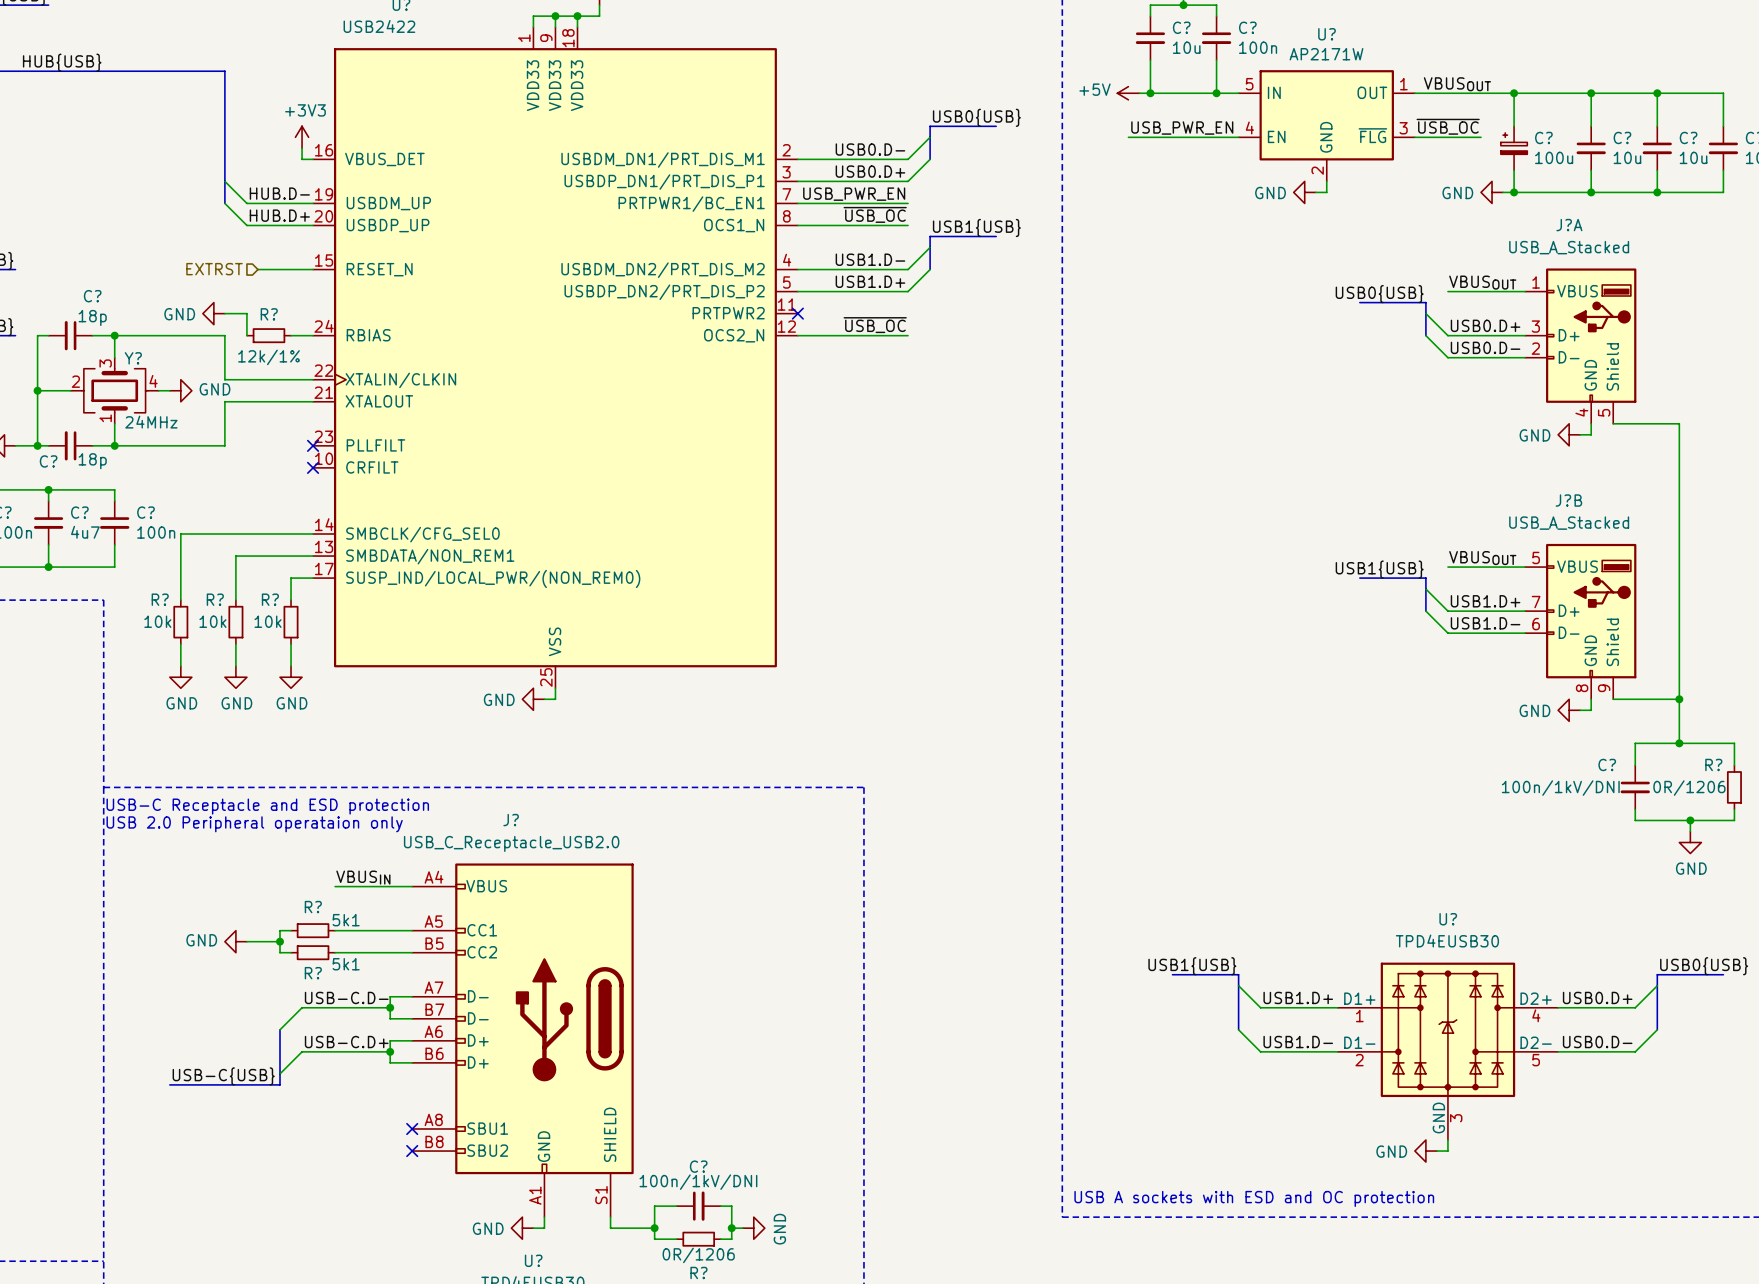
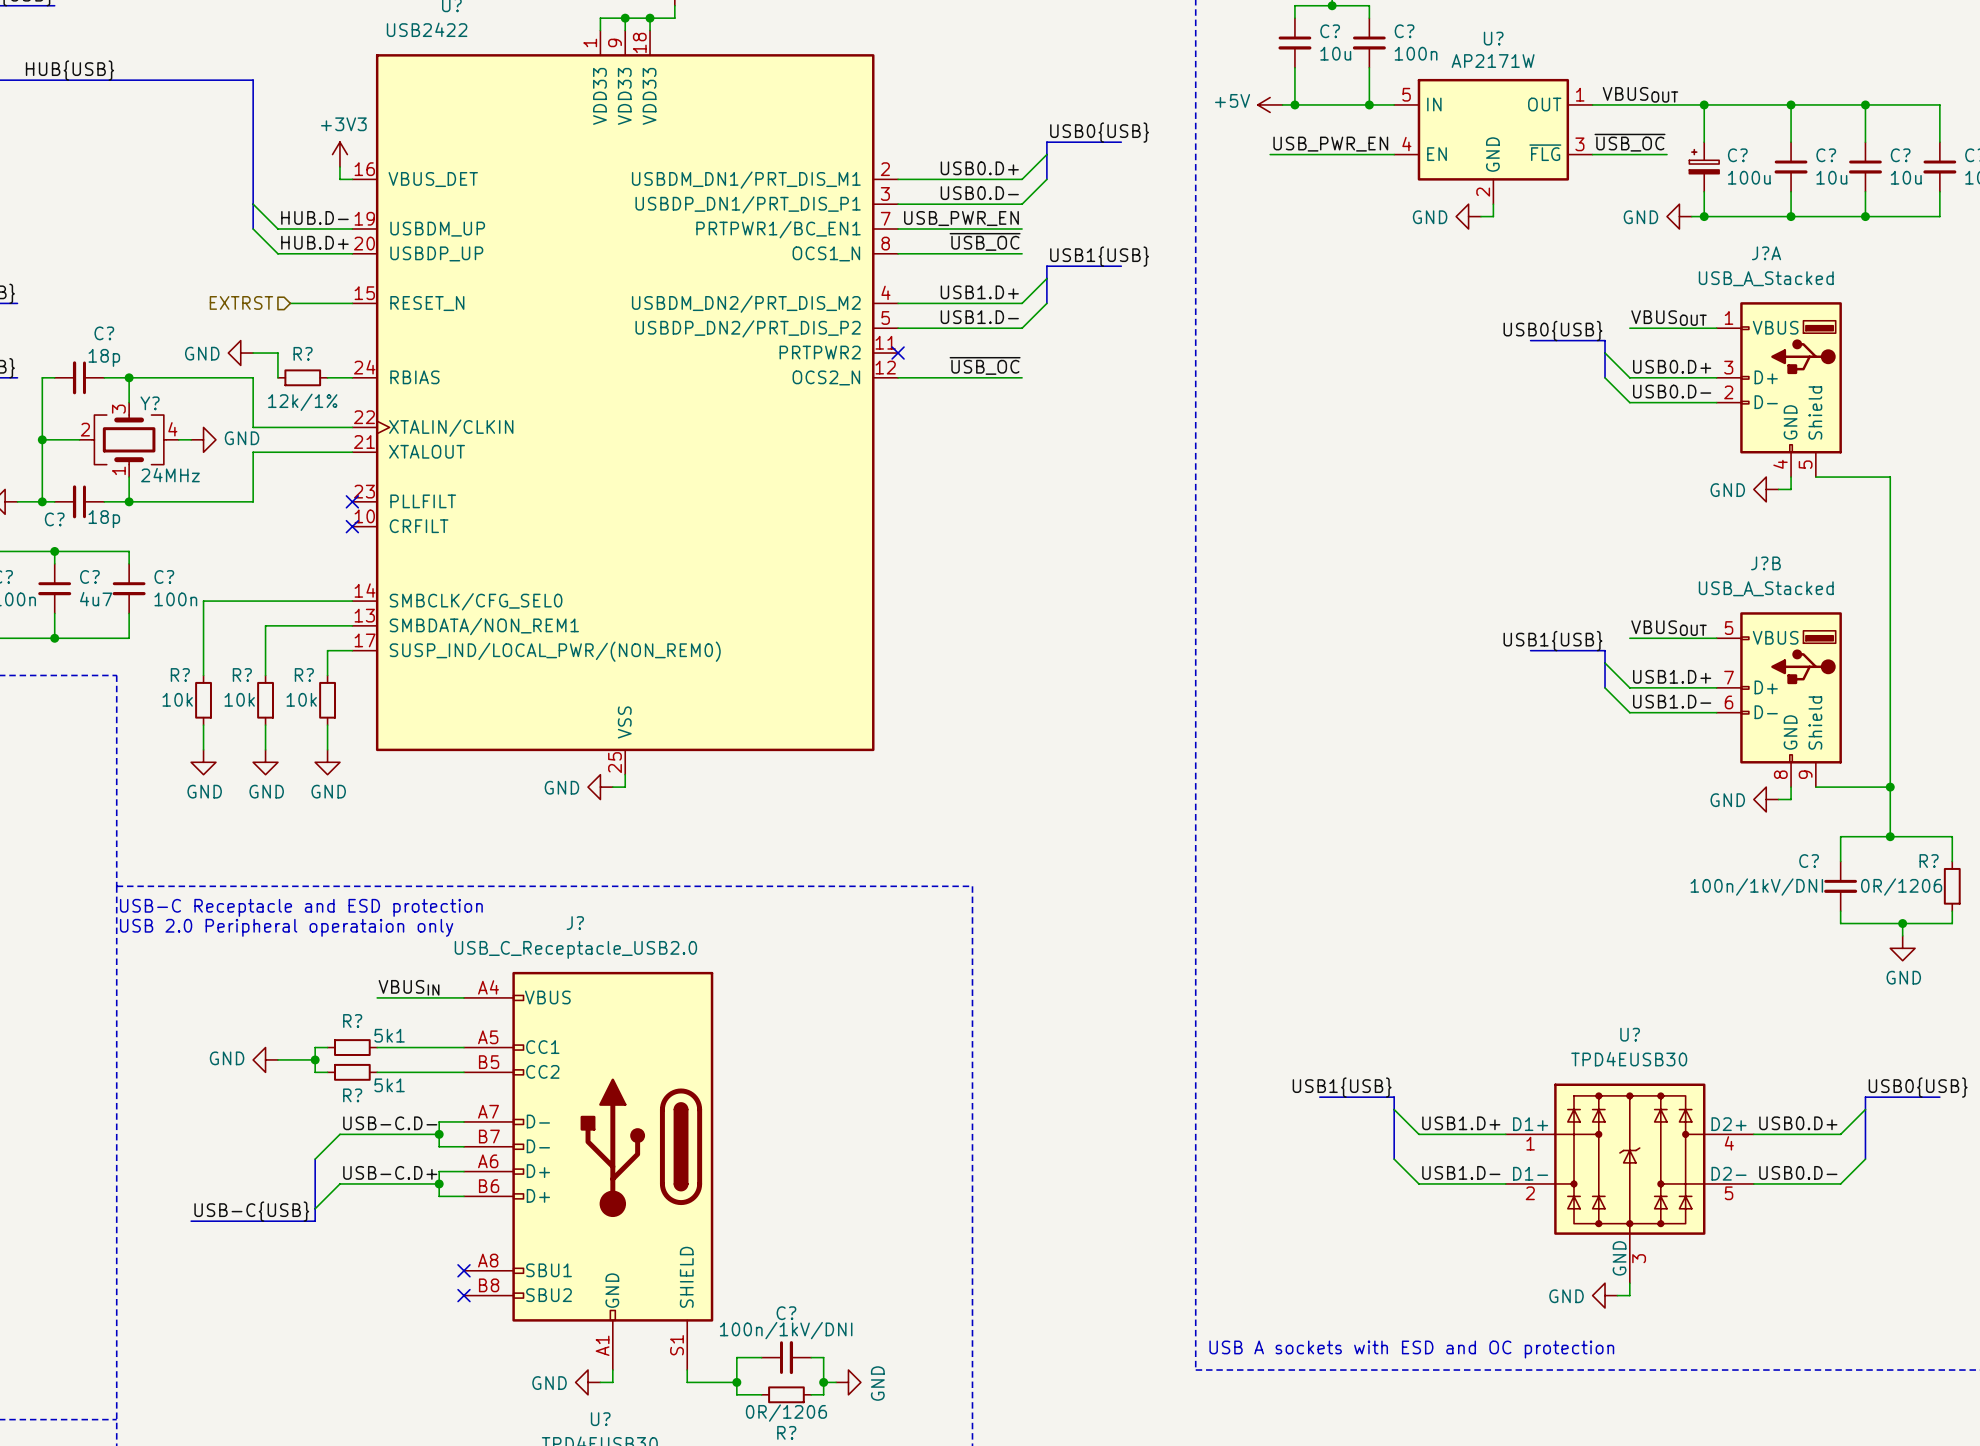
label: USB0.D- (870, 149) -> USB0.D+ (979, 168)
label: USB0.D+ (870, 171) -> USB0.D- (979, 193)
label: USB1.D- (870, 259) -> USB1.D+ (979, 292)
label: USB1.D+ (870, 281) -> USB1.D- (979, 317)

